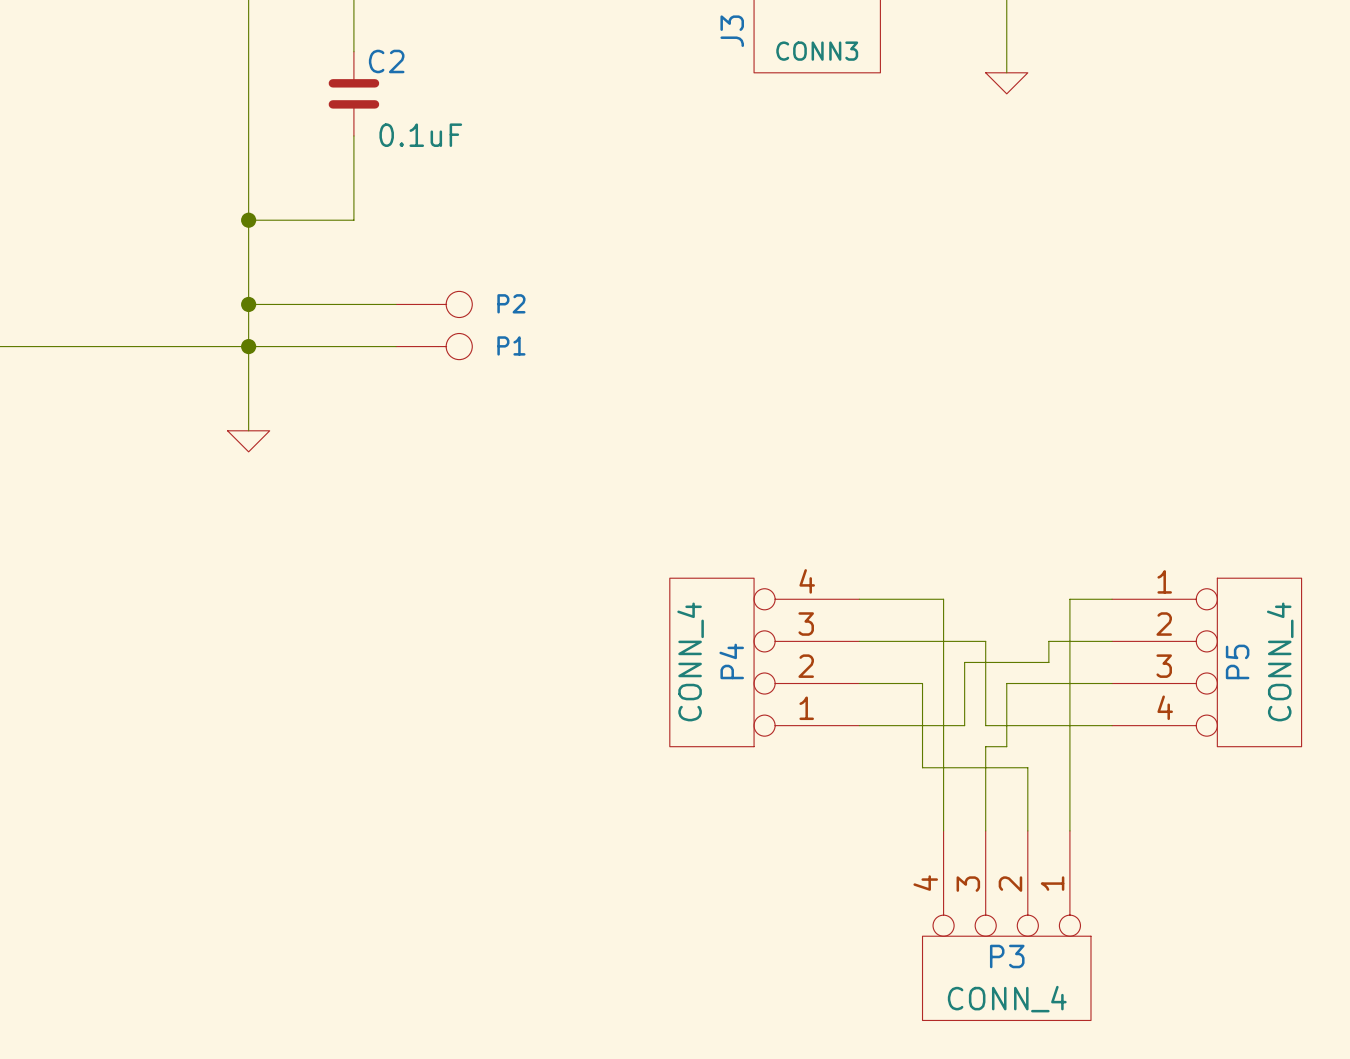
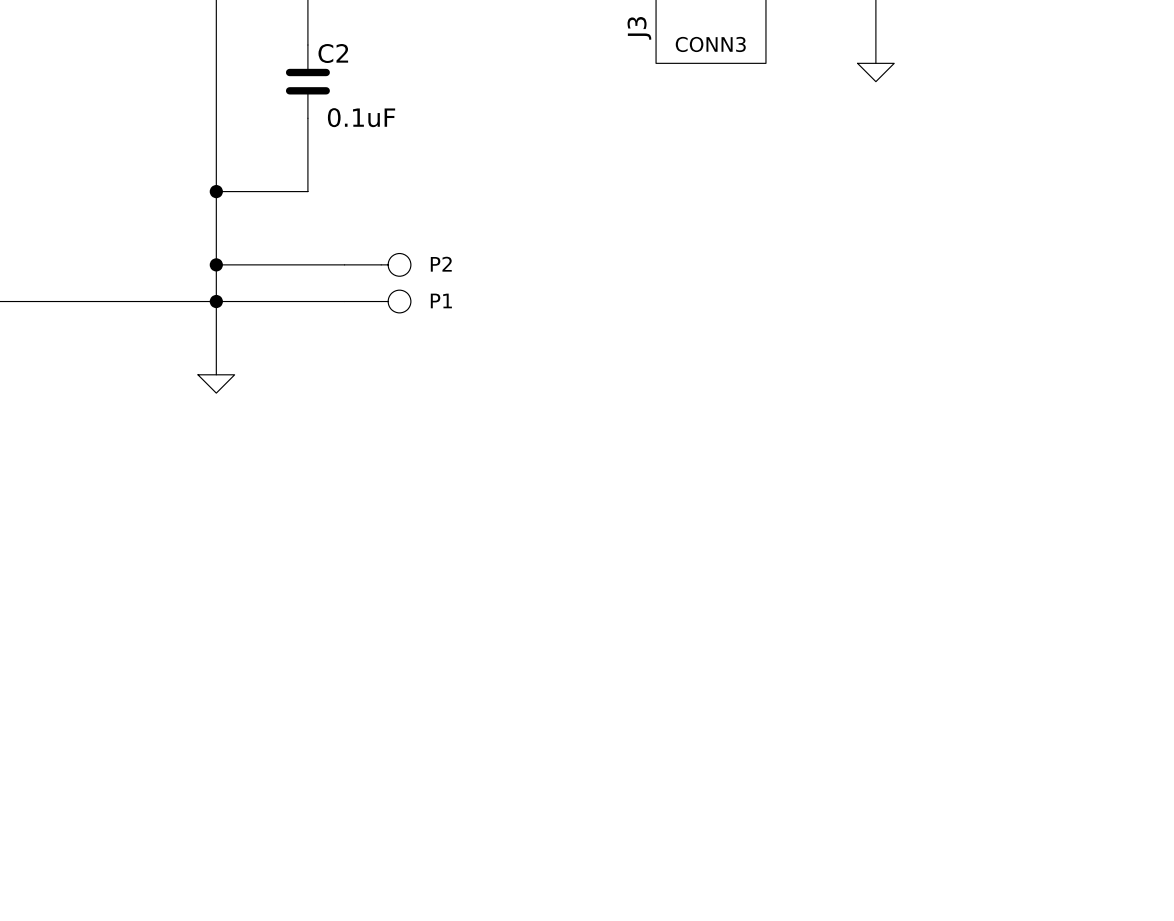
wire: (859, 599) (943, 599) (943, 830) -> none
wire: (1112, 599) (1069, 599) (1069, 830) -> none
wire: (859, 641) (985, 641) (985, 725) (1112, 725) -> none
wire: (1112, 641) (1048, 641) (1048, 662) (964, 662) (964, 725) (859, 725) -> none
P4: CONN_4 (764, 662) -> none
P5: CONN_4 (1206, 662) -> none
wire: (859, 683) (922, 683) (922, 767) (1027, 767) (1027, 830) -> none
wire: (1112, 683) (1006, 683) (1006, 746) (985, 746) (985, 830) -> none
P3: CONN_4 (1006, 925) -> none

